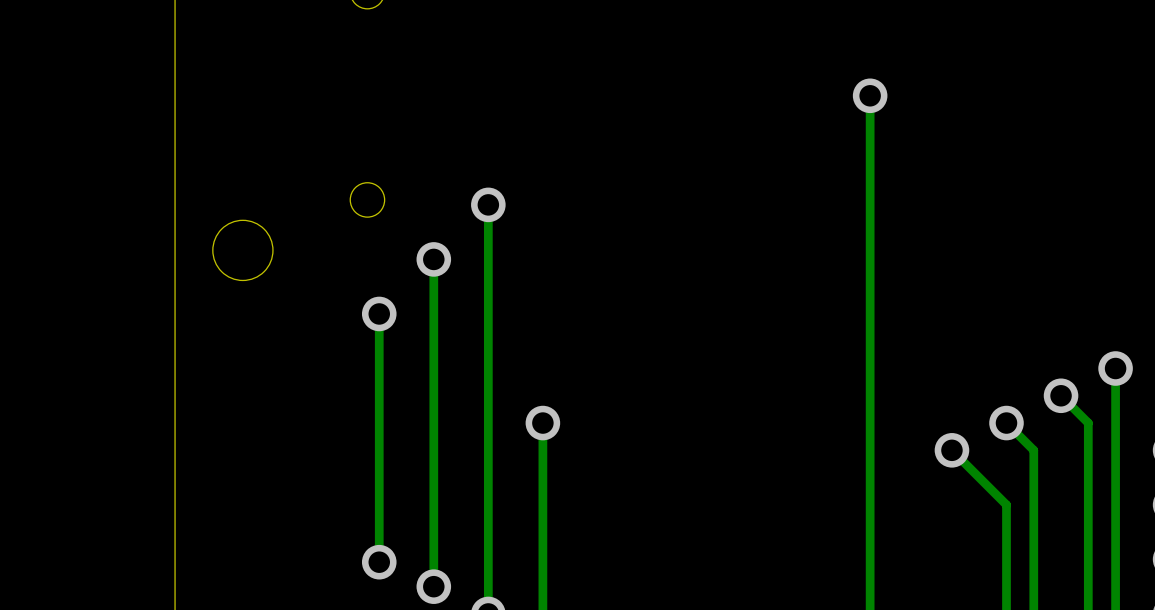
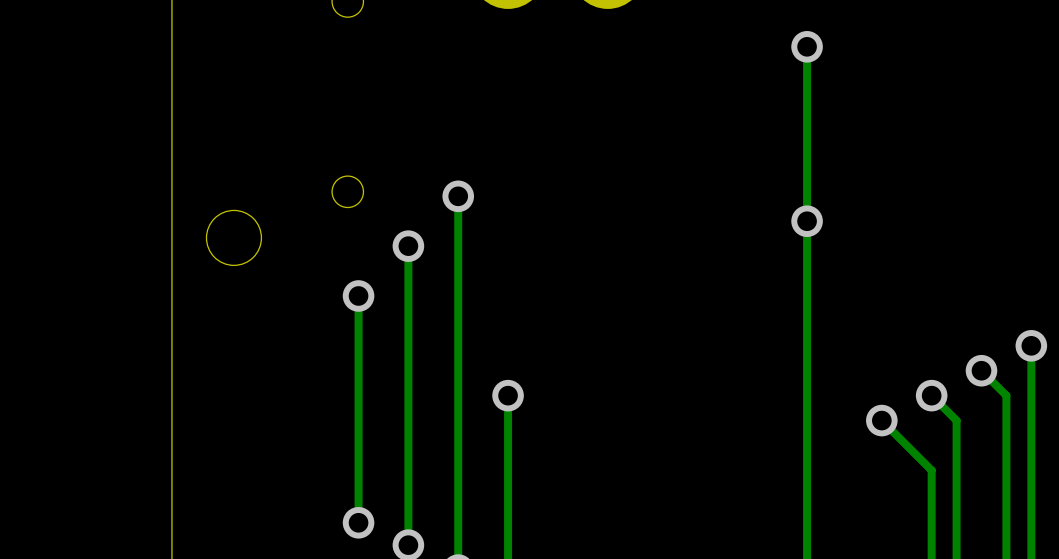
track: none -> (807, 46) (807, 96)
via position: (870, 95) -> (807, 46)
via: none -> (807, 221)

